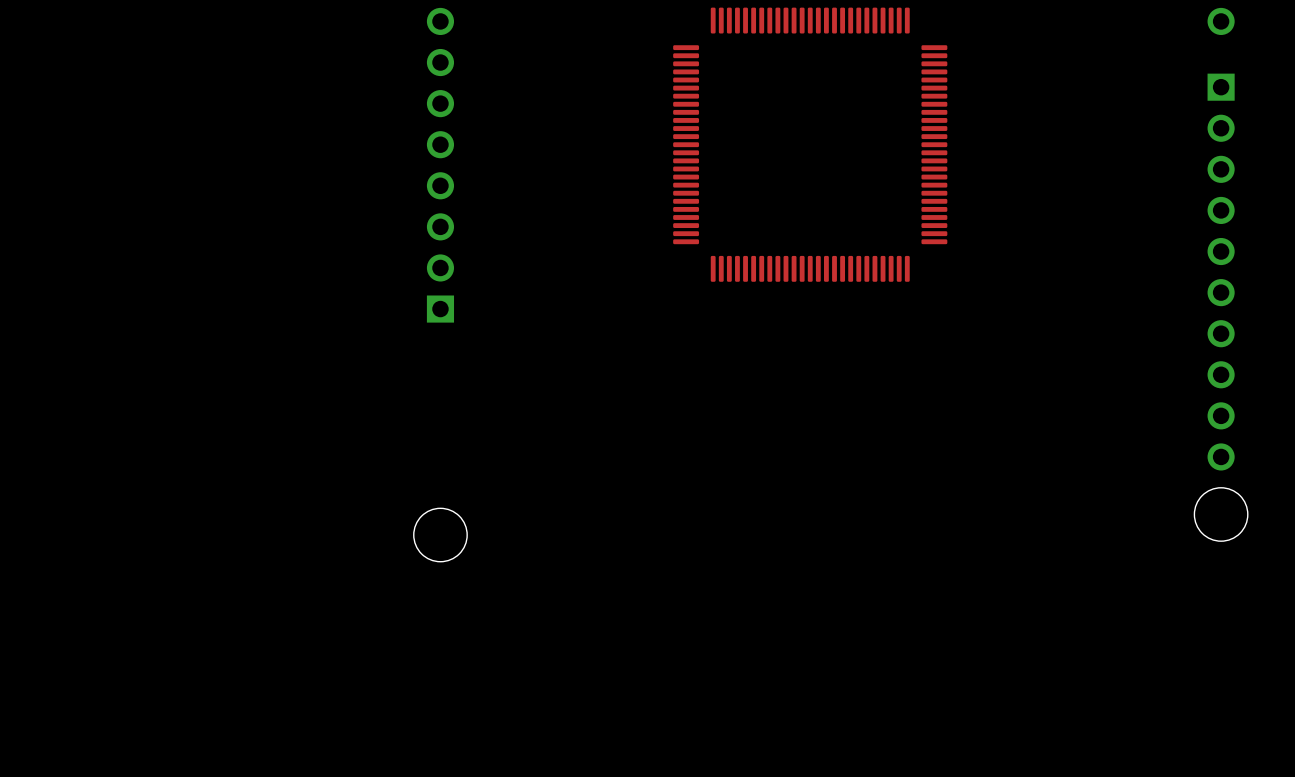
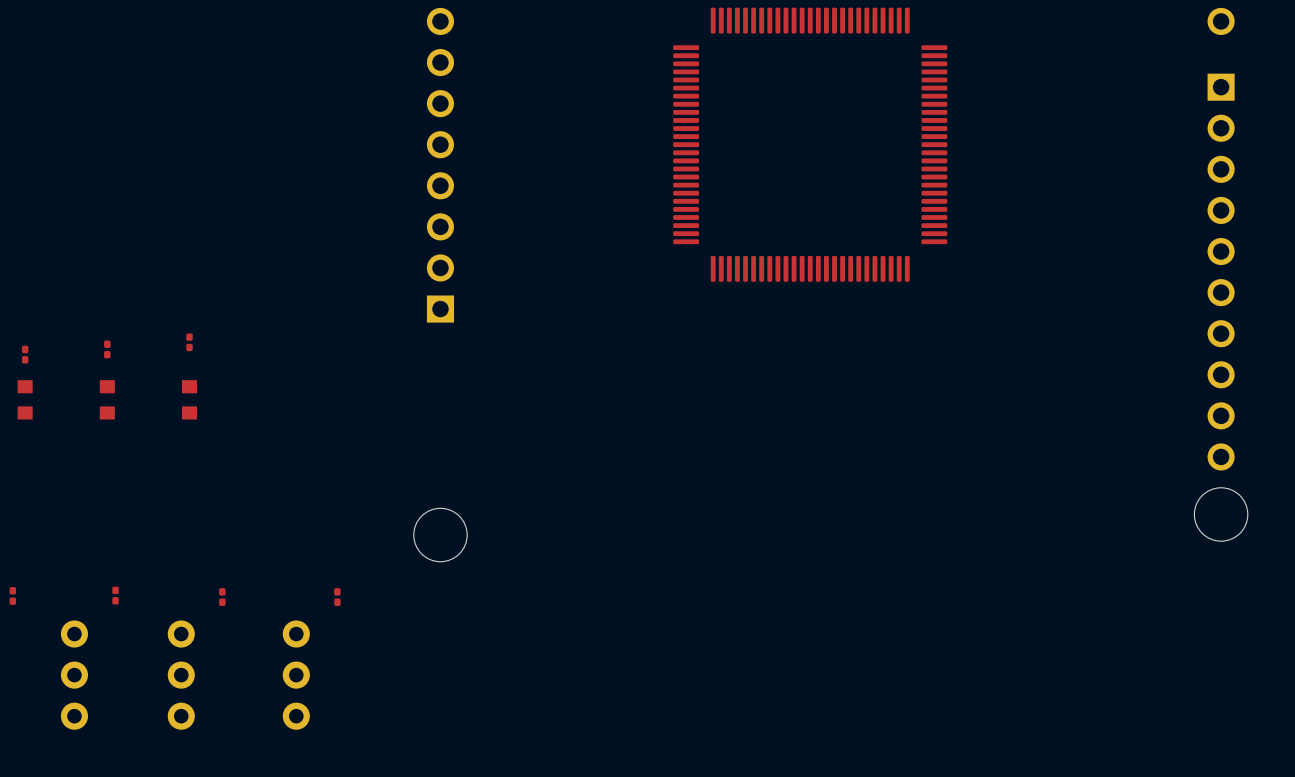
part: none -> (189, 342)
part: none -> (107, 349)
part: none -> (25, 354)
part: none -> (25, 399)
part: none -> (107, 399)
part: none -> (189, 399)
part: none -> (12, 595)
part: none -> (115, 595)
part: none -> (222, 597)
part: none -> (337, 597)
part: none -> (74, 675)
part: none -> (181, 675)
part: none -> (296, 675)

